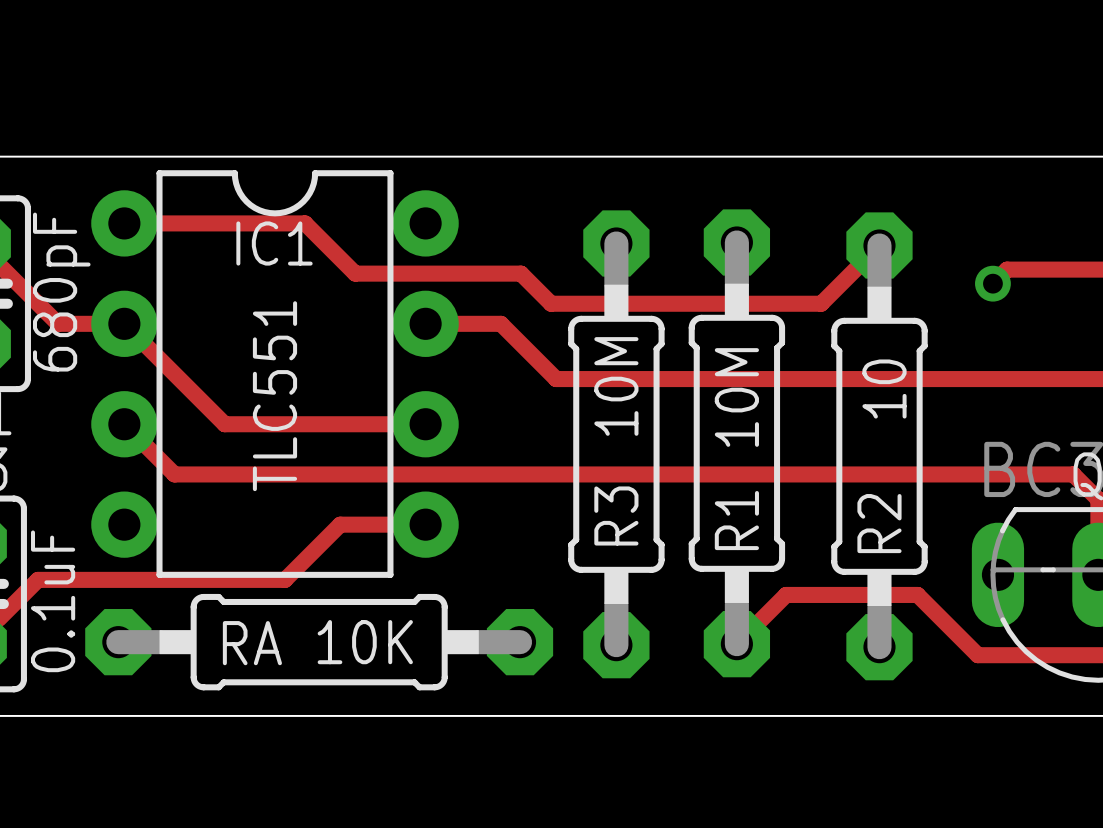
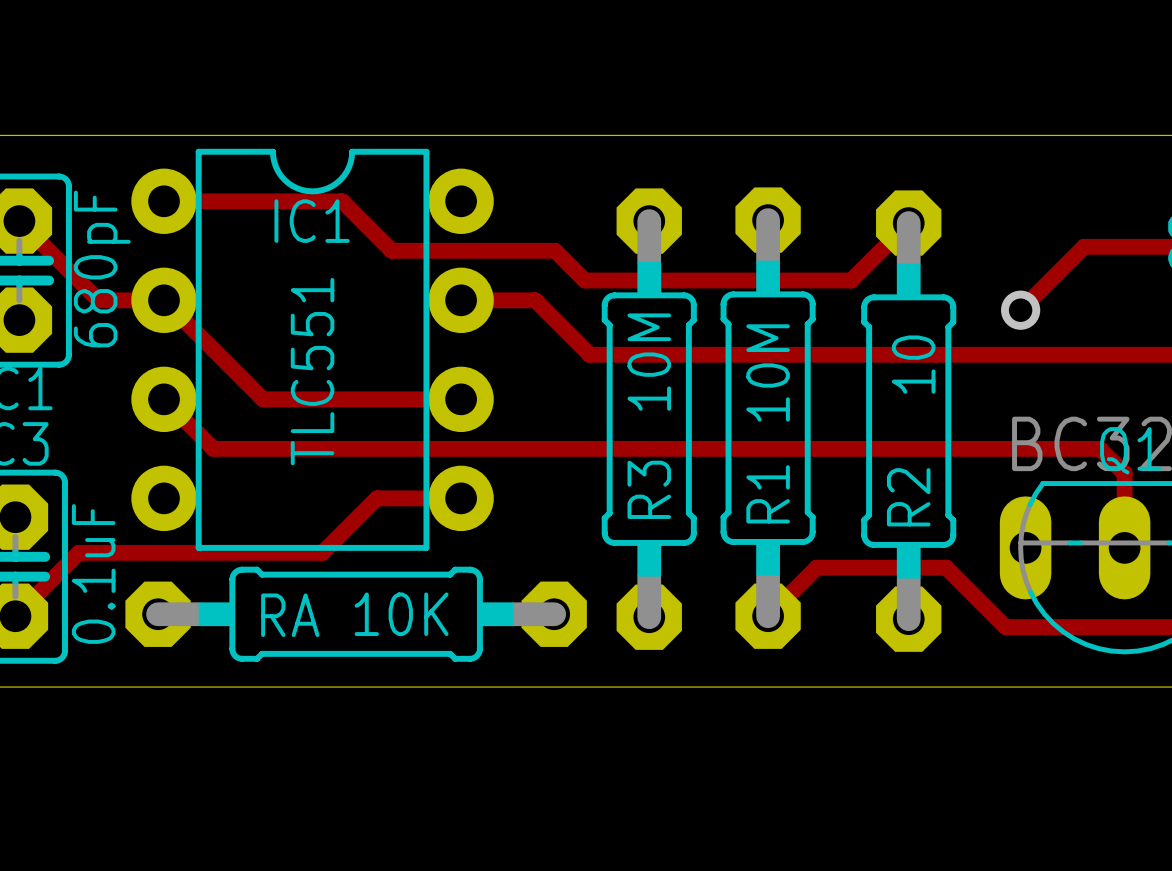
track: (1057, 269) (1007, 269) (992, 283) -> (1084, 246) (1020, 310)
via: (992, 283) -> none
via: none -> (1020, 310)

